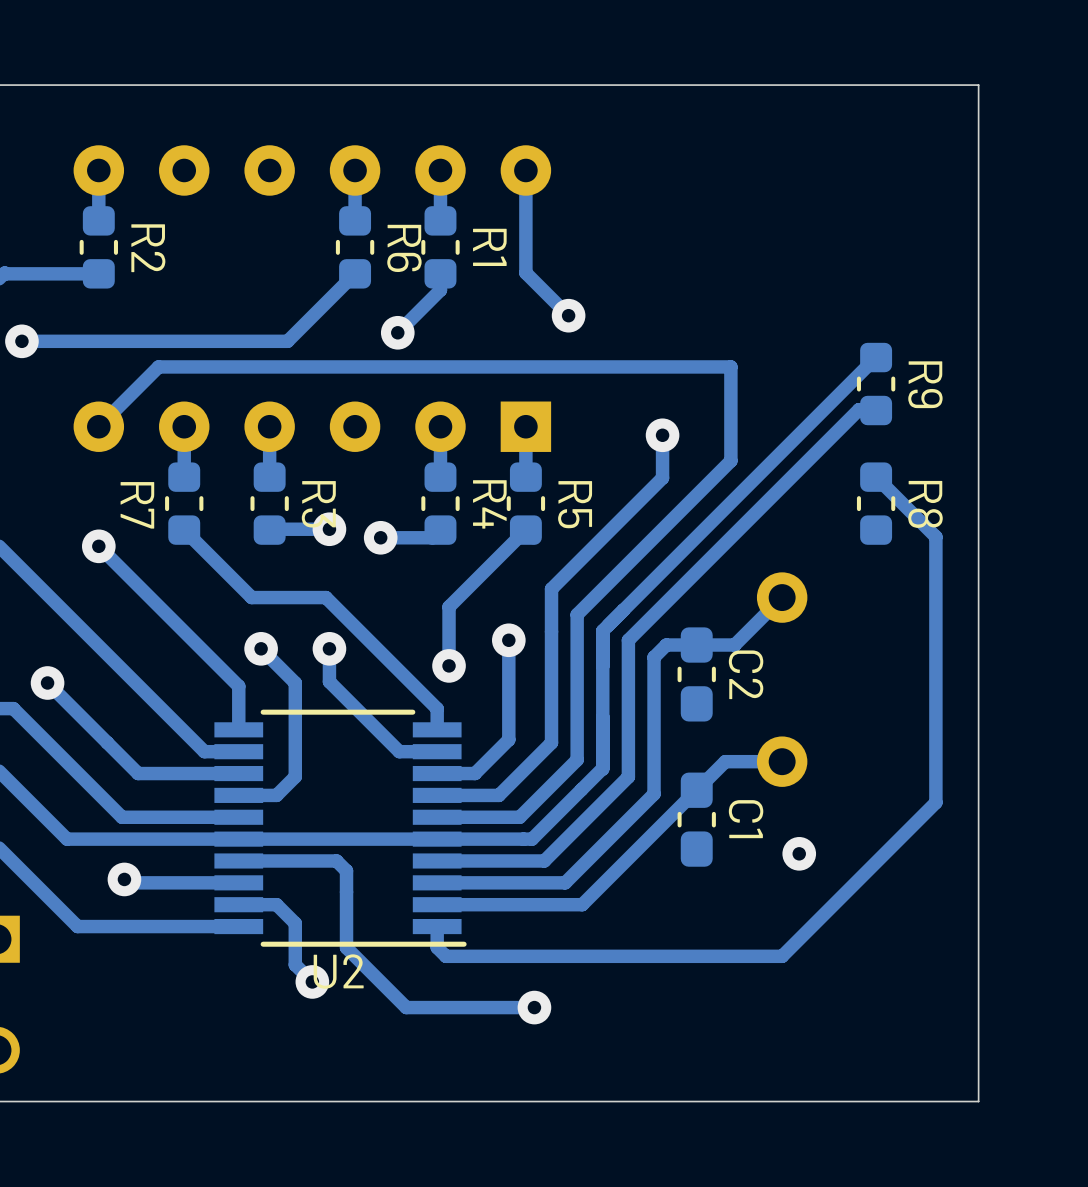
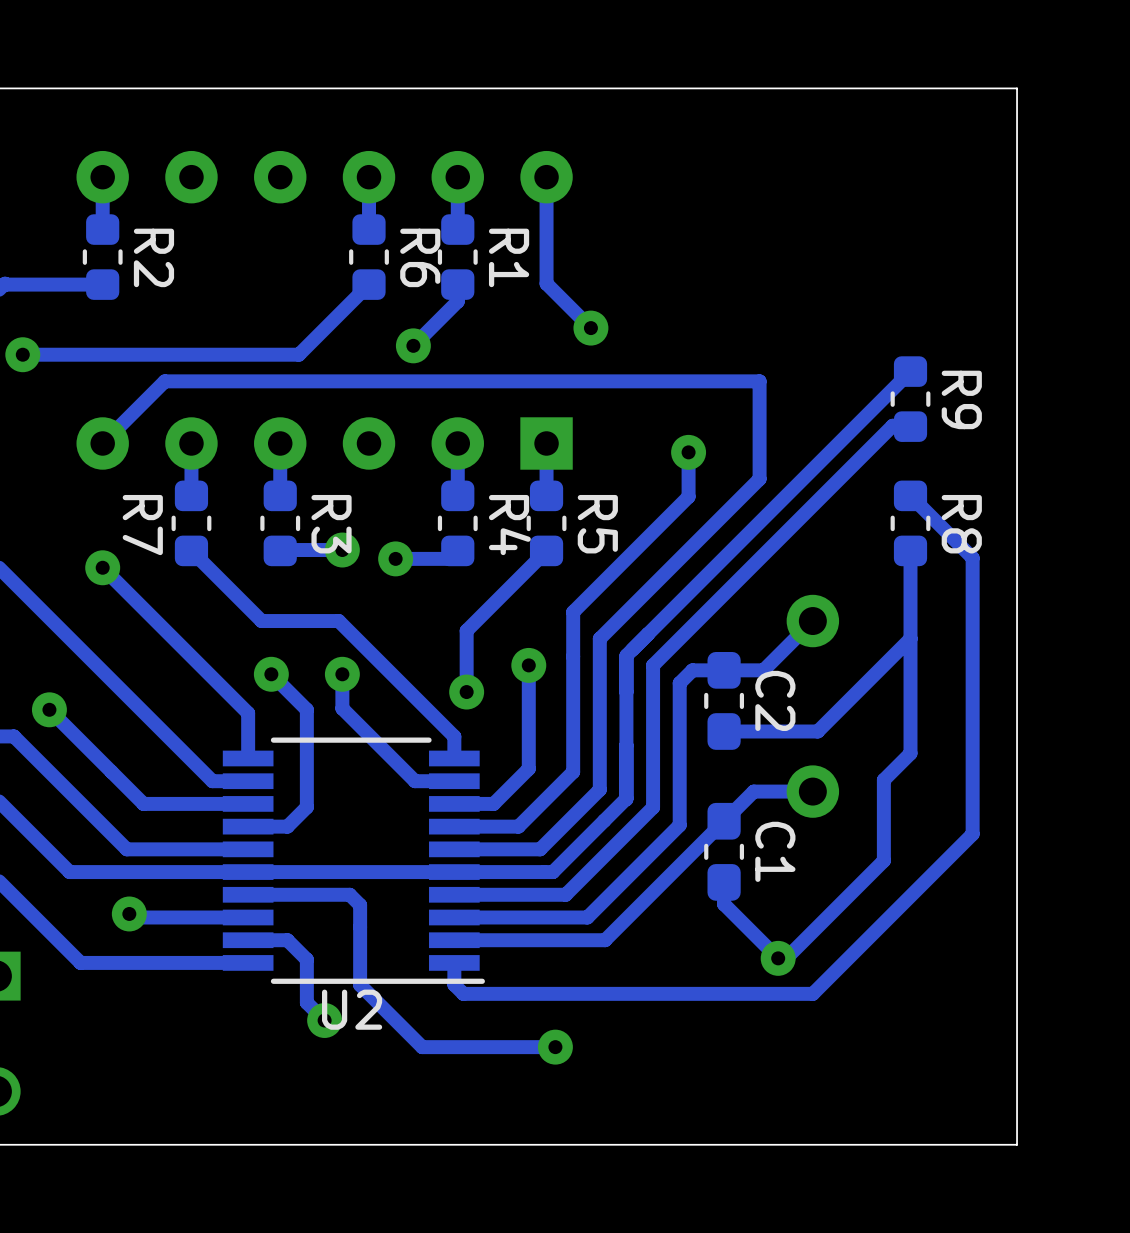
track: none -> (910, 550) (910, 753) (883, 780) (883, 860) (786, 958) (778, 958) (724, 904) (724, 882)
track: none -> (910, 638) (817, 731) (724, 731)
via position: (799, 853) -> (778, 958)

